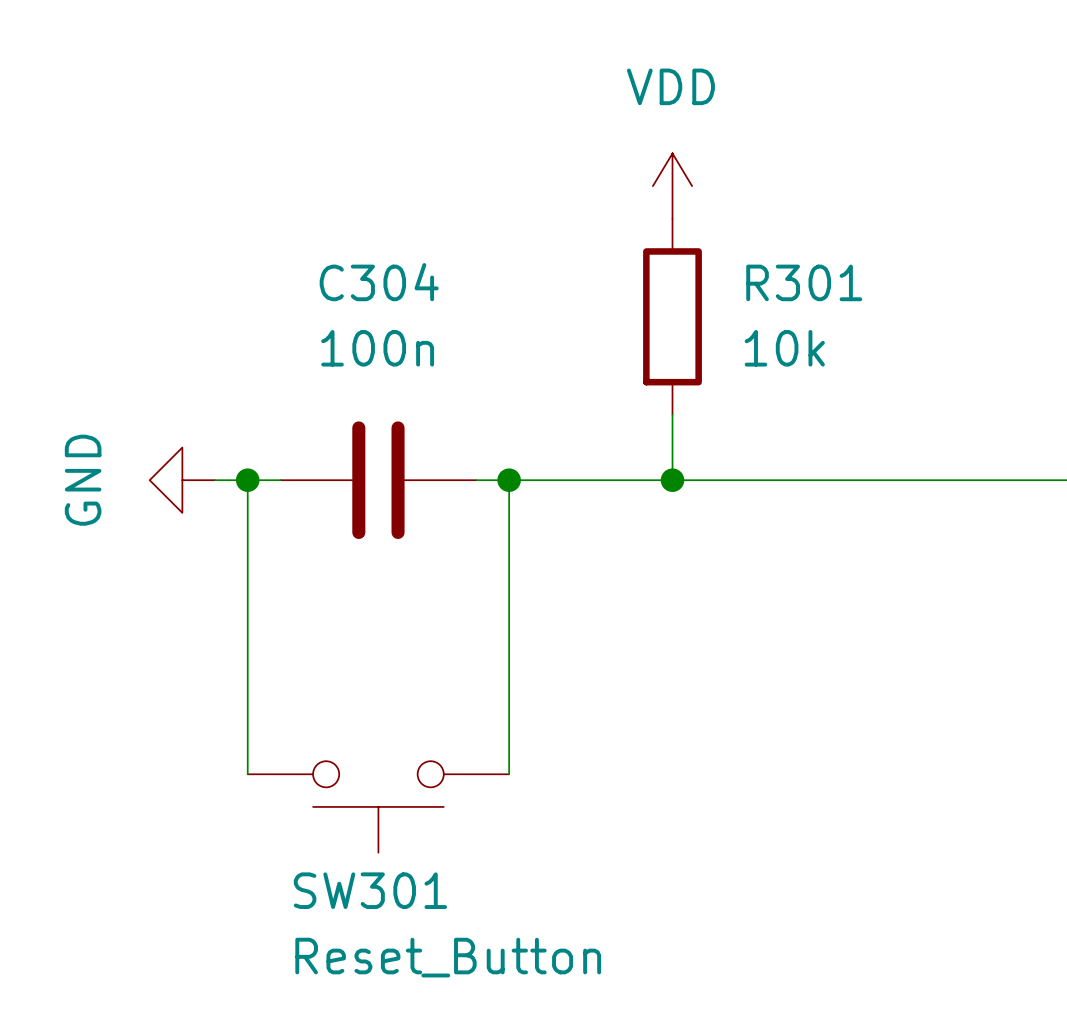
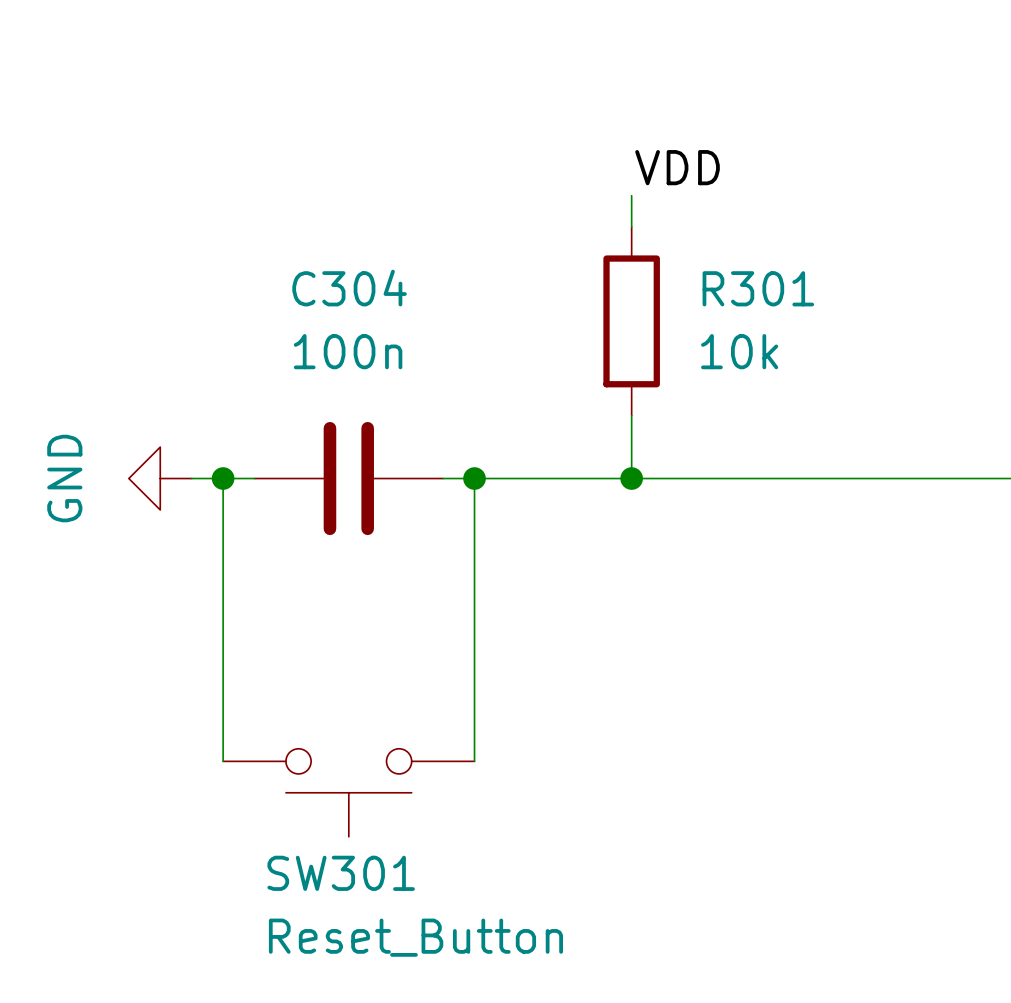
label: none -> VDD (677, 167)
power symbol: VDD (672, 186) -> none

